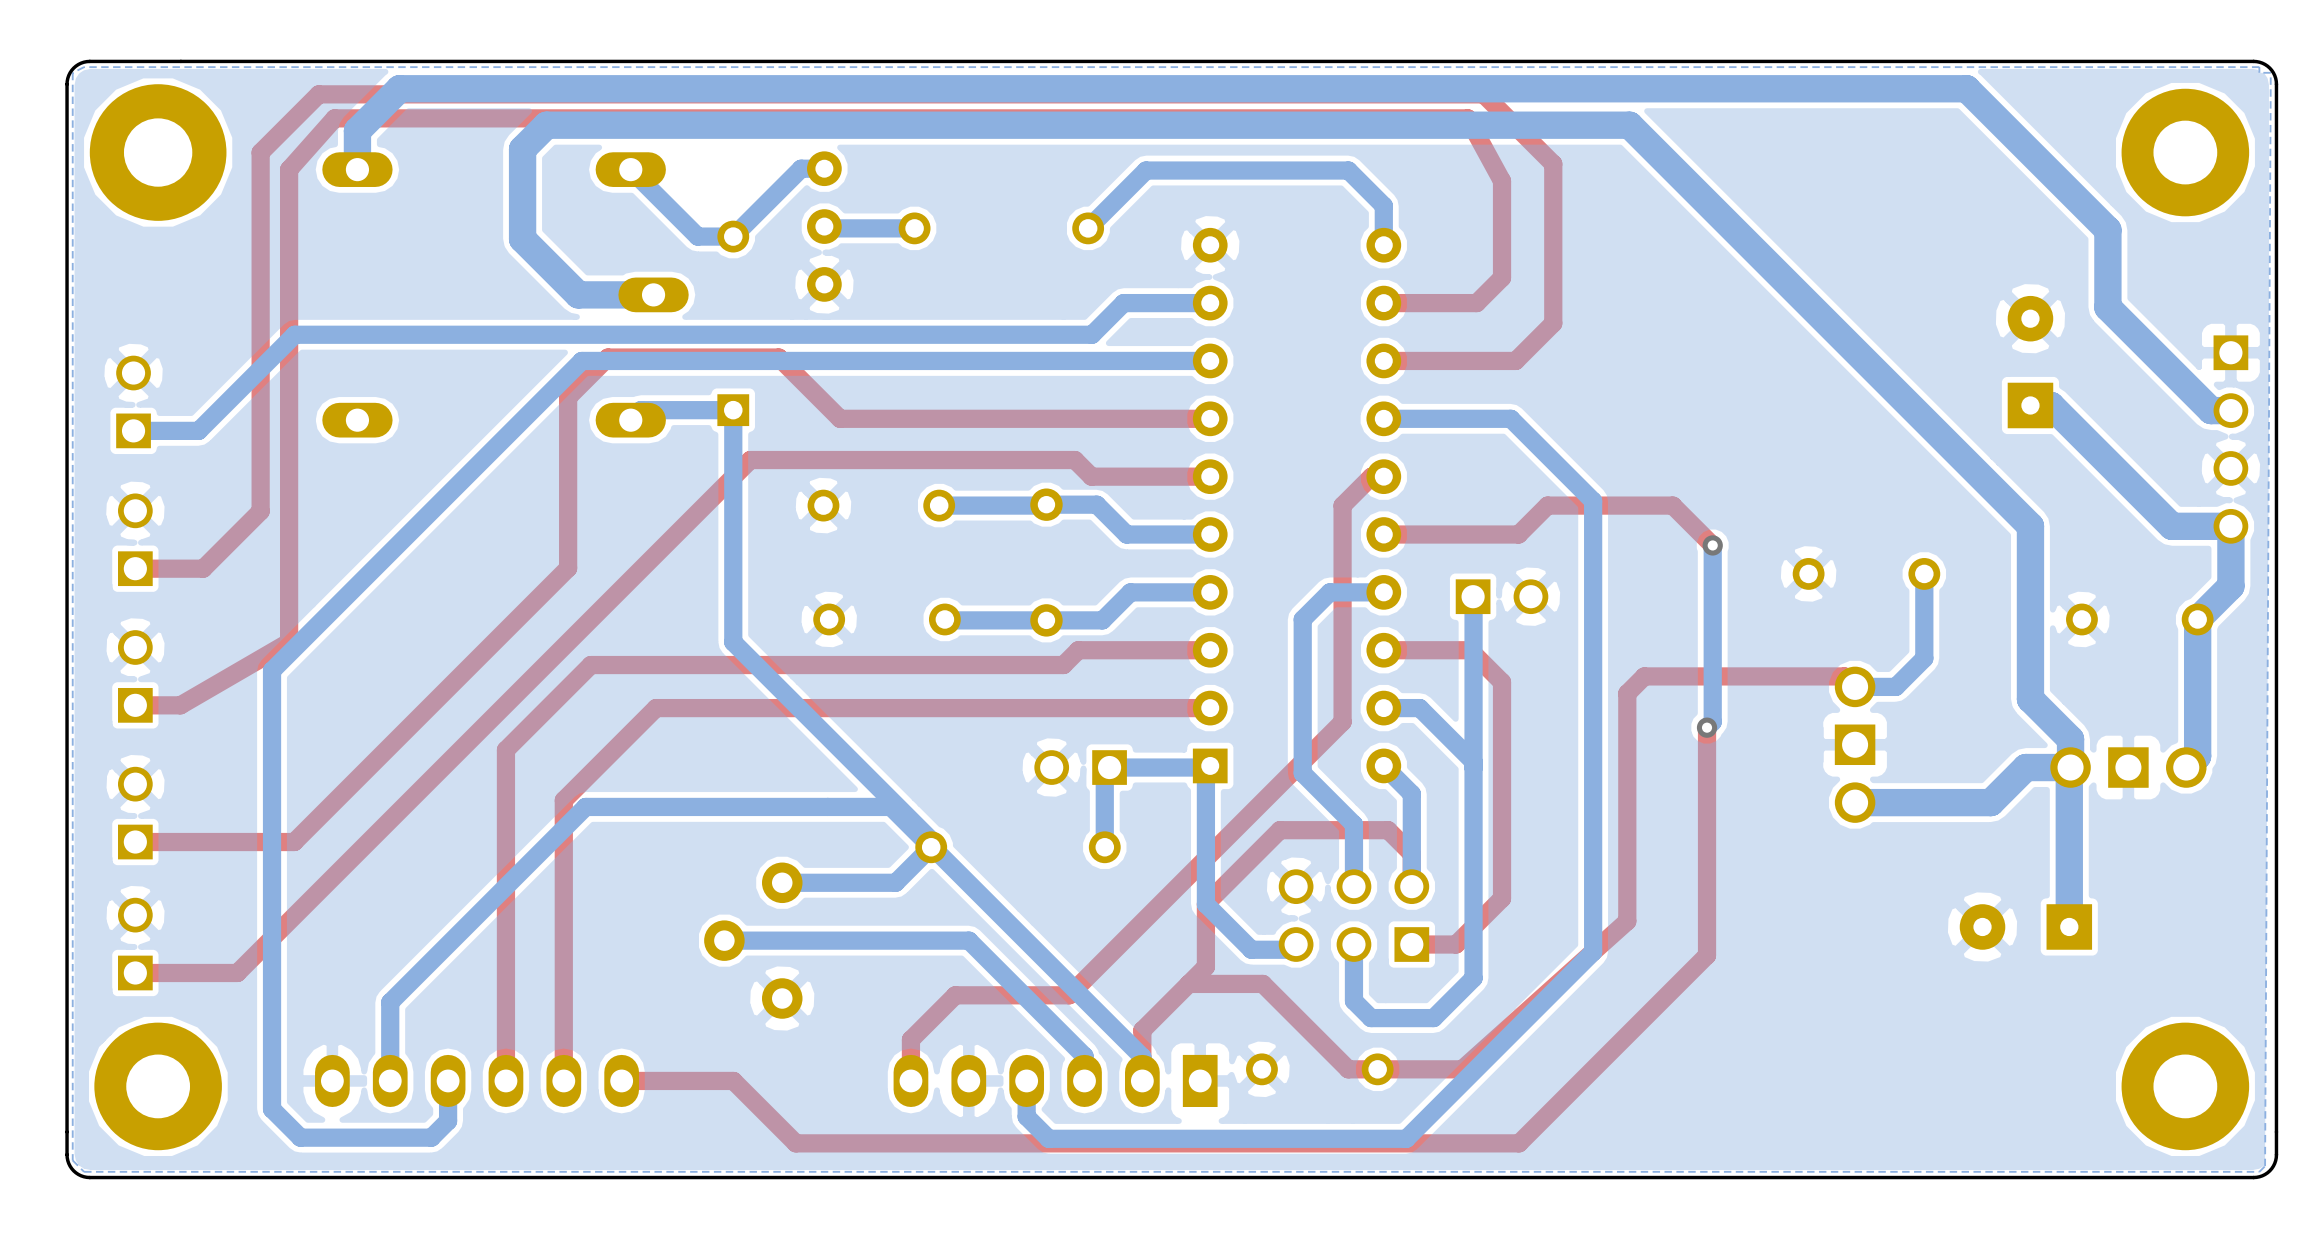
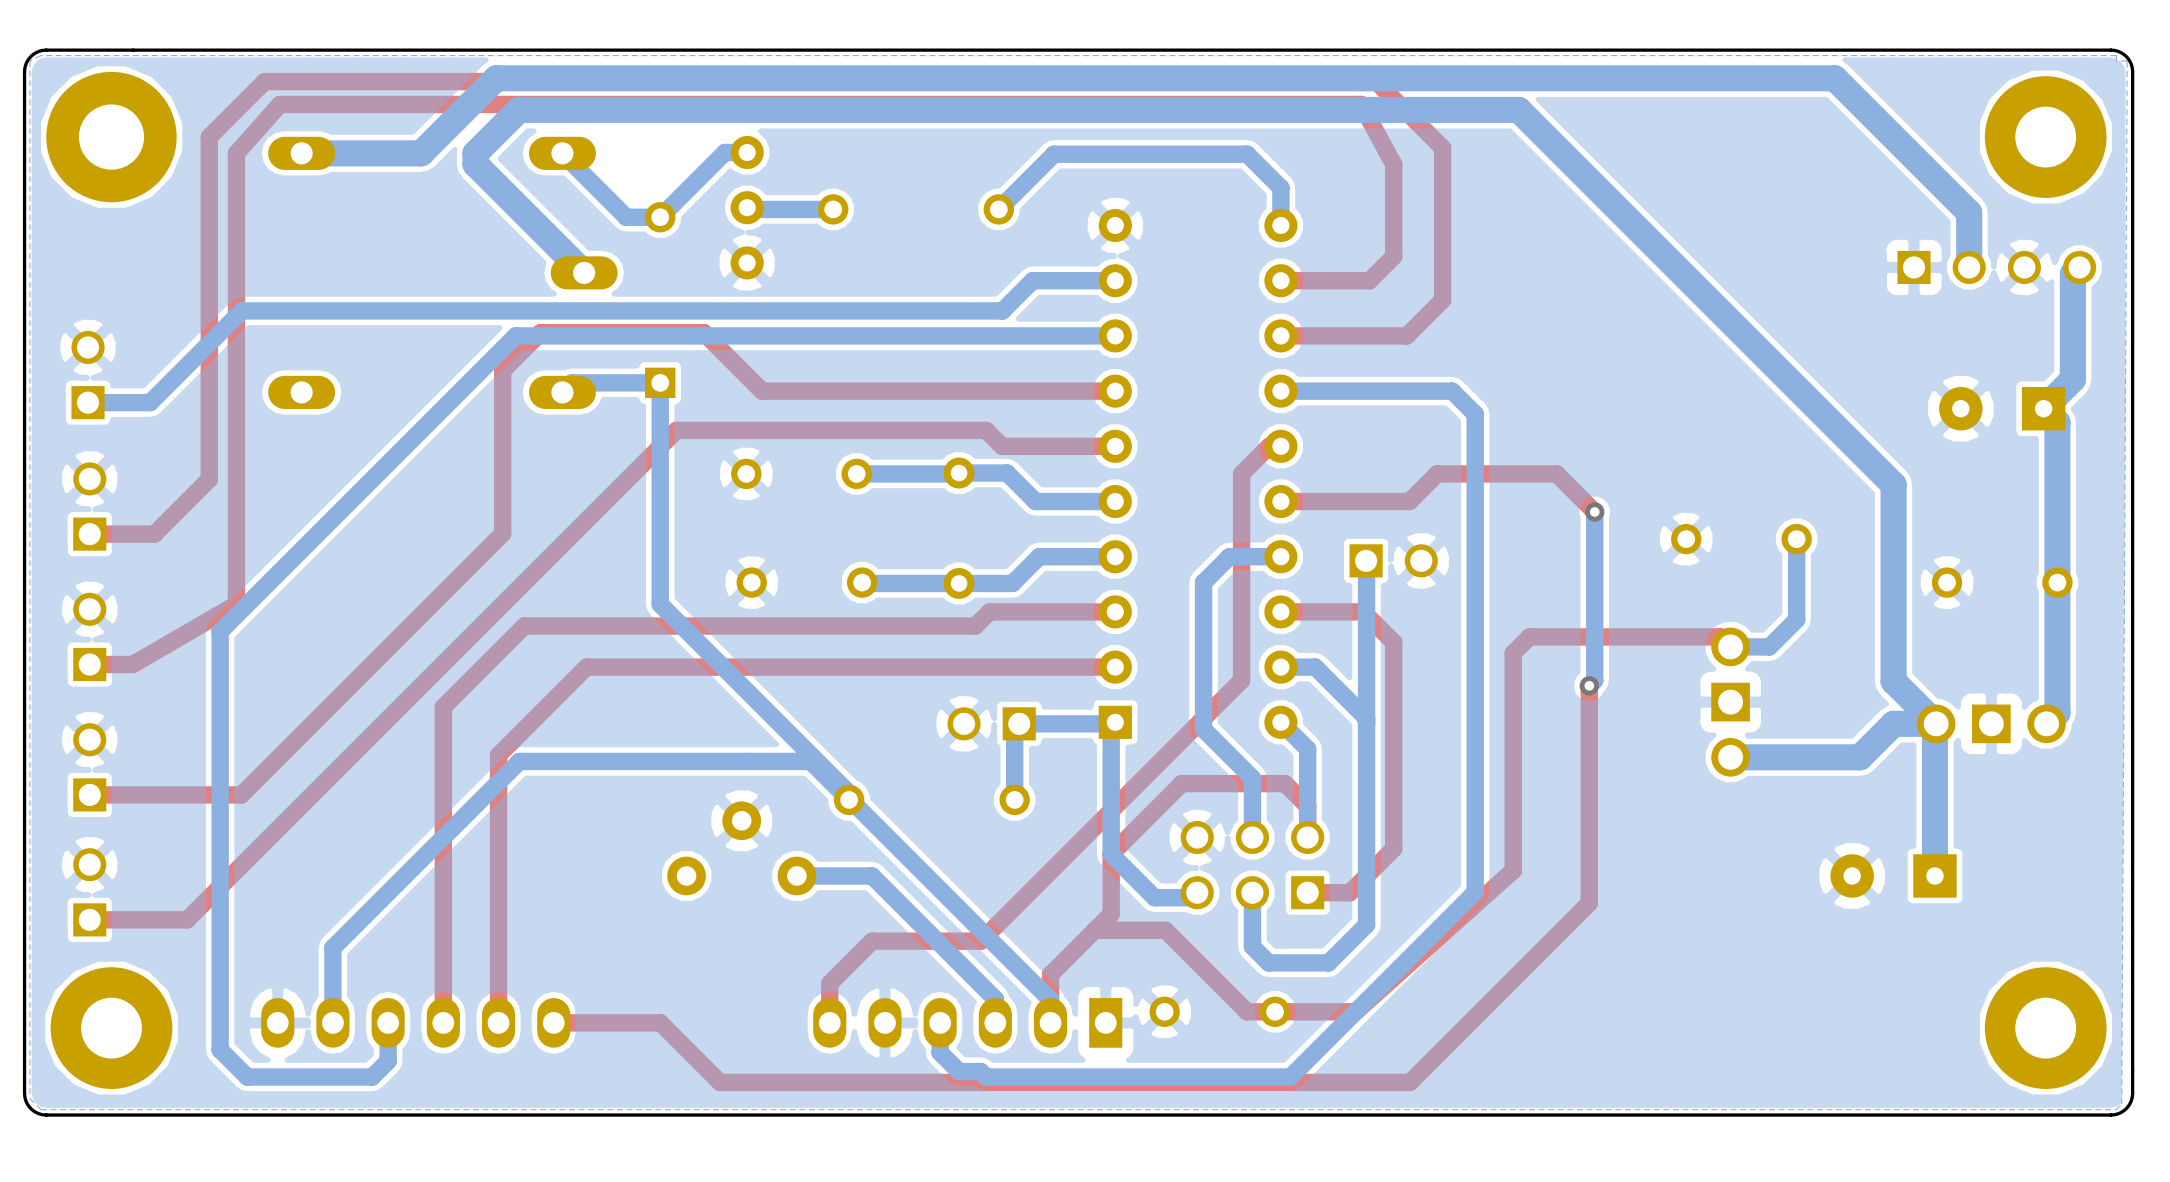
bottom track: (357, 169) (357, 130) (399, 88) (1966, 88) (2107, 229) (2107, 307) (2211, 410) (2230, 410) -> (301, 153) (421, 153) (496, 78) (1834, 78) (1969, 212) (1969, 267)
bottom track: (653, 294) (578, 294) (522, 239) (522, 149) (546, 125) (1629, 125) (2030, 526) (2030, 699) (2070, 739) (2070, 767) -> (584, 272) (475, 164) (475, 153) (518, 109) (1518, 109) (1893, 484) (1893, 681) (1936, 723)
part rotation: 0° (2030, 362) -> 90° counterclockwise (2002, 408)
part position: (2030, 362) -> (2002, 408)
bottom track: (2030, 405) (2051, 405) (2171, 526) (2230, 526) (2230, 586) (2197, 619) -> (2079, 267) (2072, 274) (2072, 379) (2043, 408) (2057, 422) (2057, 582)
bottom track: (1510, 418) (1593, 501) (1593, 952) (1406, 1138) (1048, 1138) (1026, 1116) (1026, 1112) -> (1402, 391) (1452, 391) (1475, 414) (1475, 892) (1290, 1077) (986, 1077) (980, 1071) (959, 1071) (940, 1052)
part rotation: 0° (2230, 439) -> 90° counterclockwise (1996, 267)
part position: (2230, 439) -> (1996, 267)
bottom track: (931, 847) (895, 882) (782, 882) -> none
part rotation: 0° (753, 940) -> 90° clockwise (741, 848)
bottom track: (969, 940) (724, 940) -> (885, 889) (872, 875) (796, 875)

